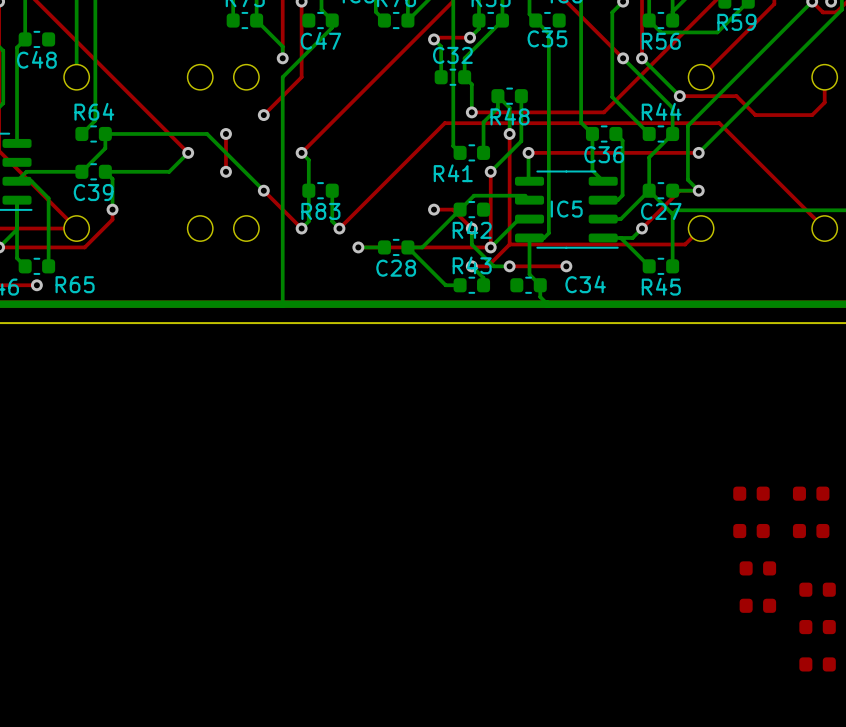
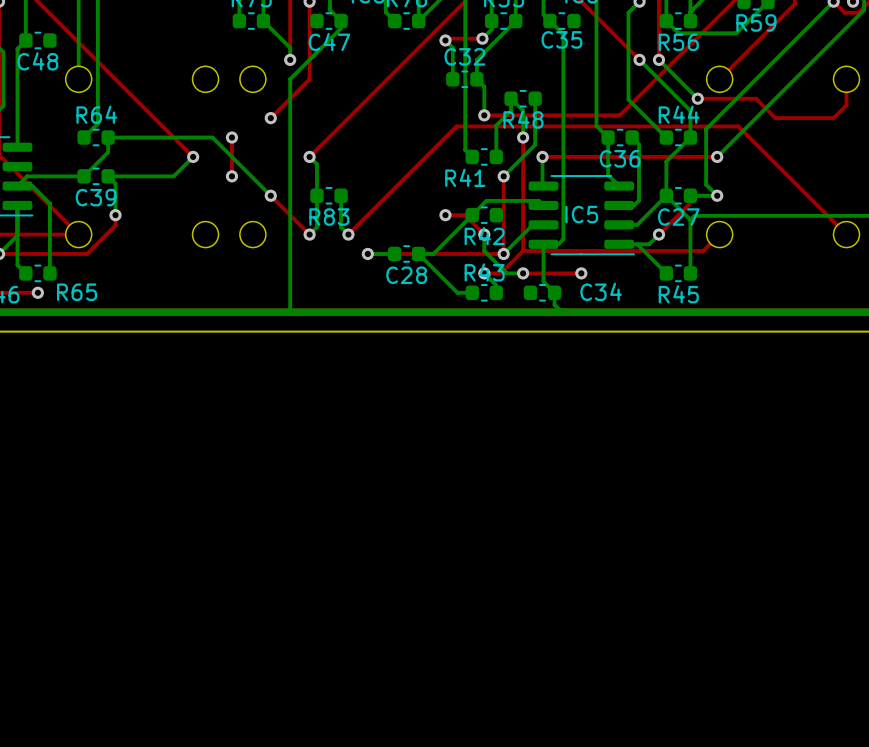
part: (751, 493) -> none
part: (811, 493) -> none
part: (751, 531) -> none
part: (811, 531) -> none
part: (757, 568) -> none
part: (817, 589) -> none
part: (757, 605) -> none
part: (817, 627) -> none
part: (817, 664) -> none

